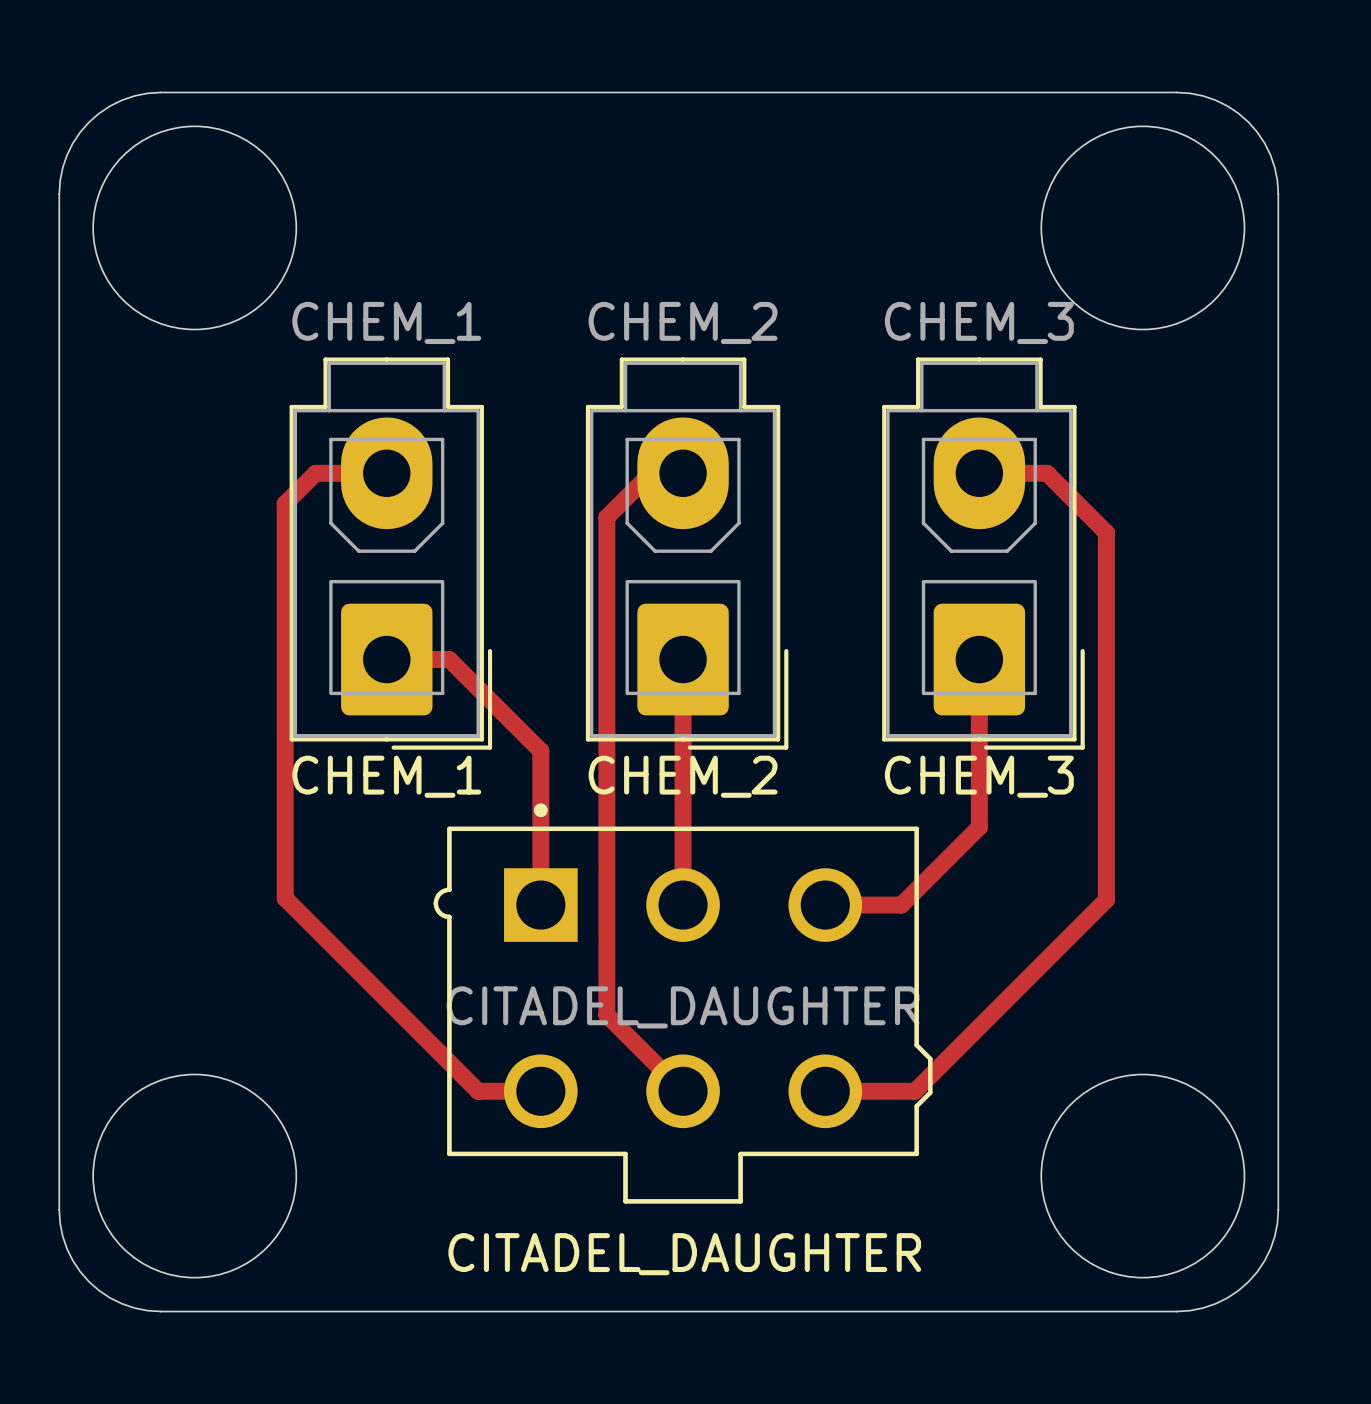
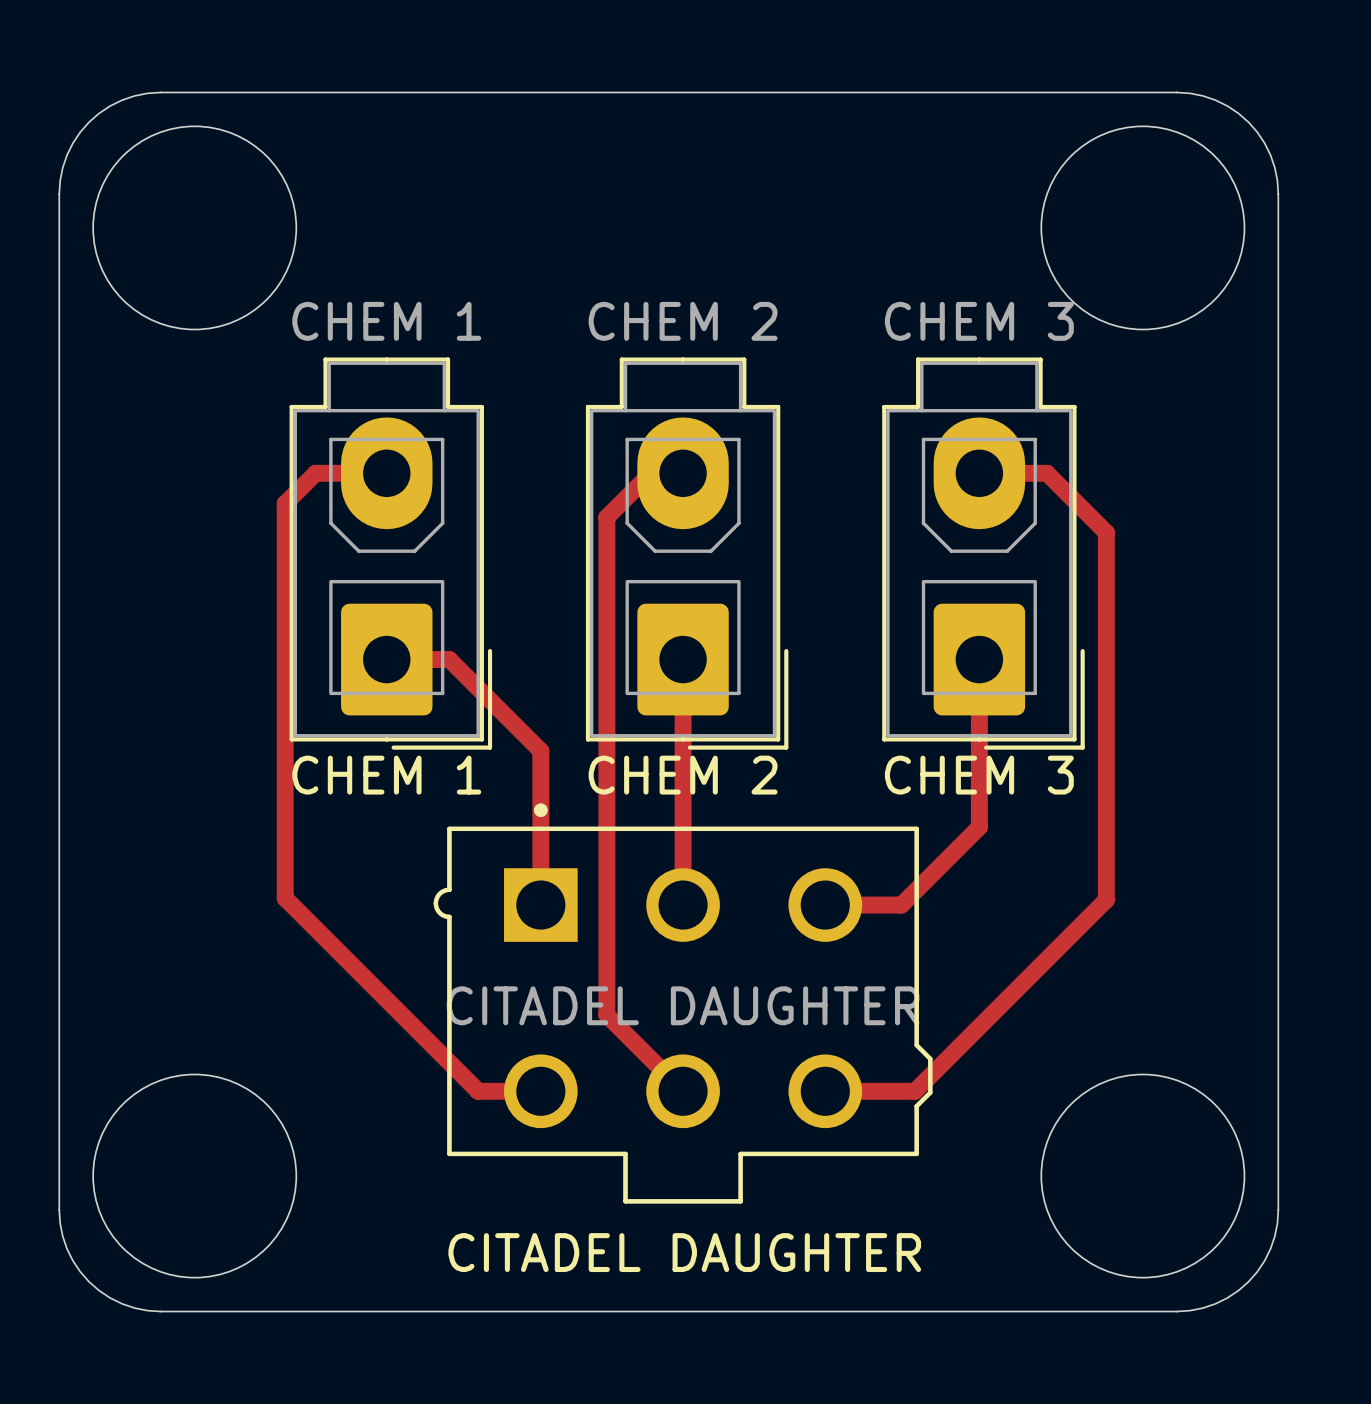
CHEM_1 value: CHEM_1 (386, 322) -> CHEM 1 (386, 321)
CHEM_2 value: CHEM_2 (683, 322) -> CHEM 2 (683, 321)
CHEM_3 value: CHEM_3 (979, 322) -> CHEM 3 (979, 321)
CHEM_1 name: CHEM_1 (386, 776) -> CHEM 1 (386, 775)
CHEM_2 name: CHEM_2 (683, 776) -> CHEM 2 (683, 775)
CHEM_3 name: CHEM_3 (979, 776) -> CHEM 3 (979, 775)
CITADEL_DAUGHTER value: CITADEL_DAUGHTER (683, 1007) -> CITADEL DAUGHTER (683, 1005)
CITADEL_DAUGHTER name: CITADEL_DAUGHTER (684, 1254) -> CITADEL DAUGHTER (684, 1252)

